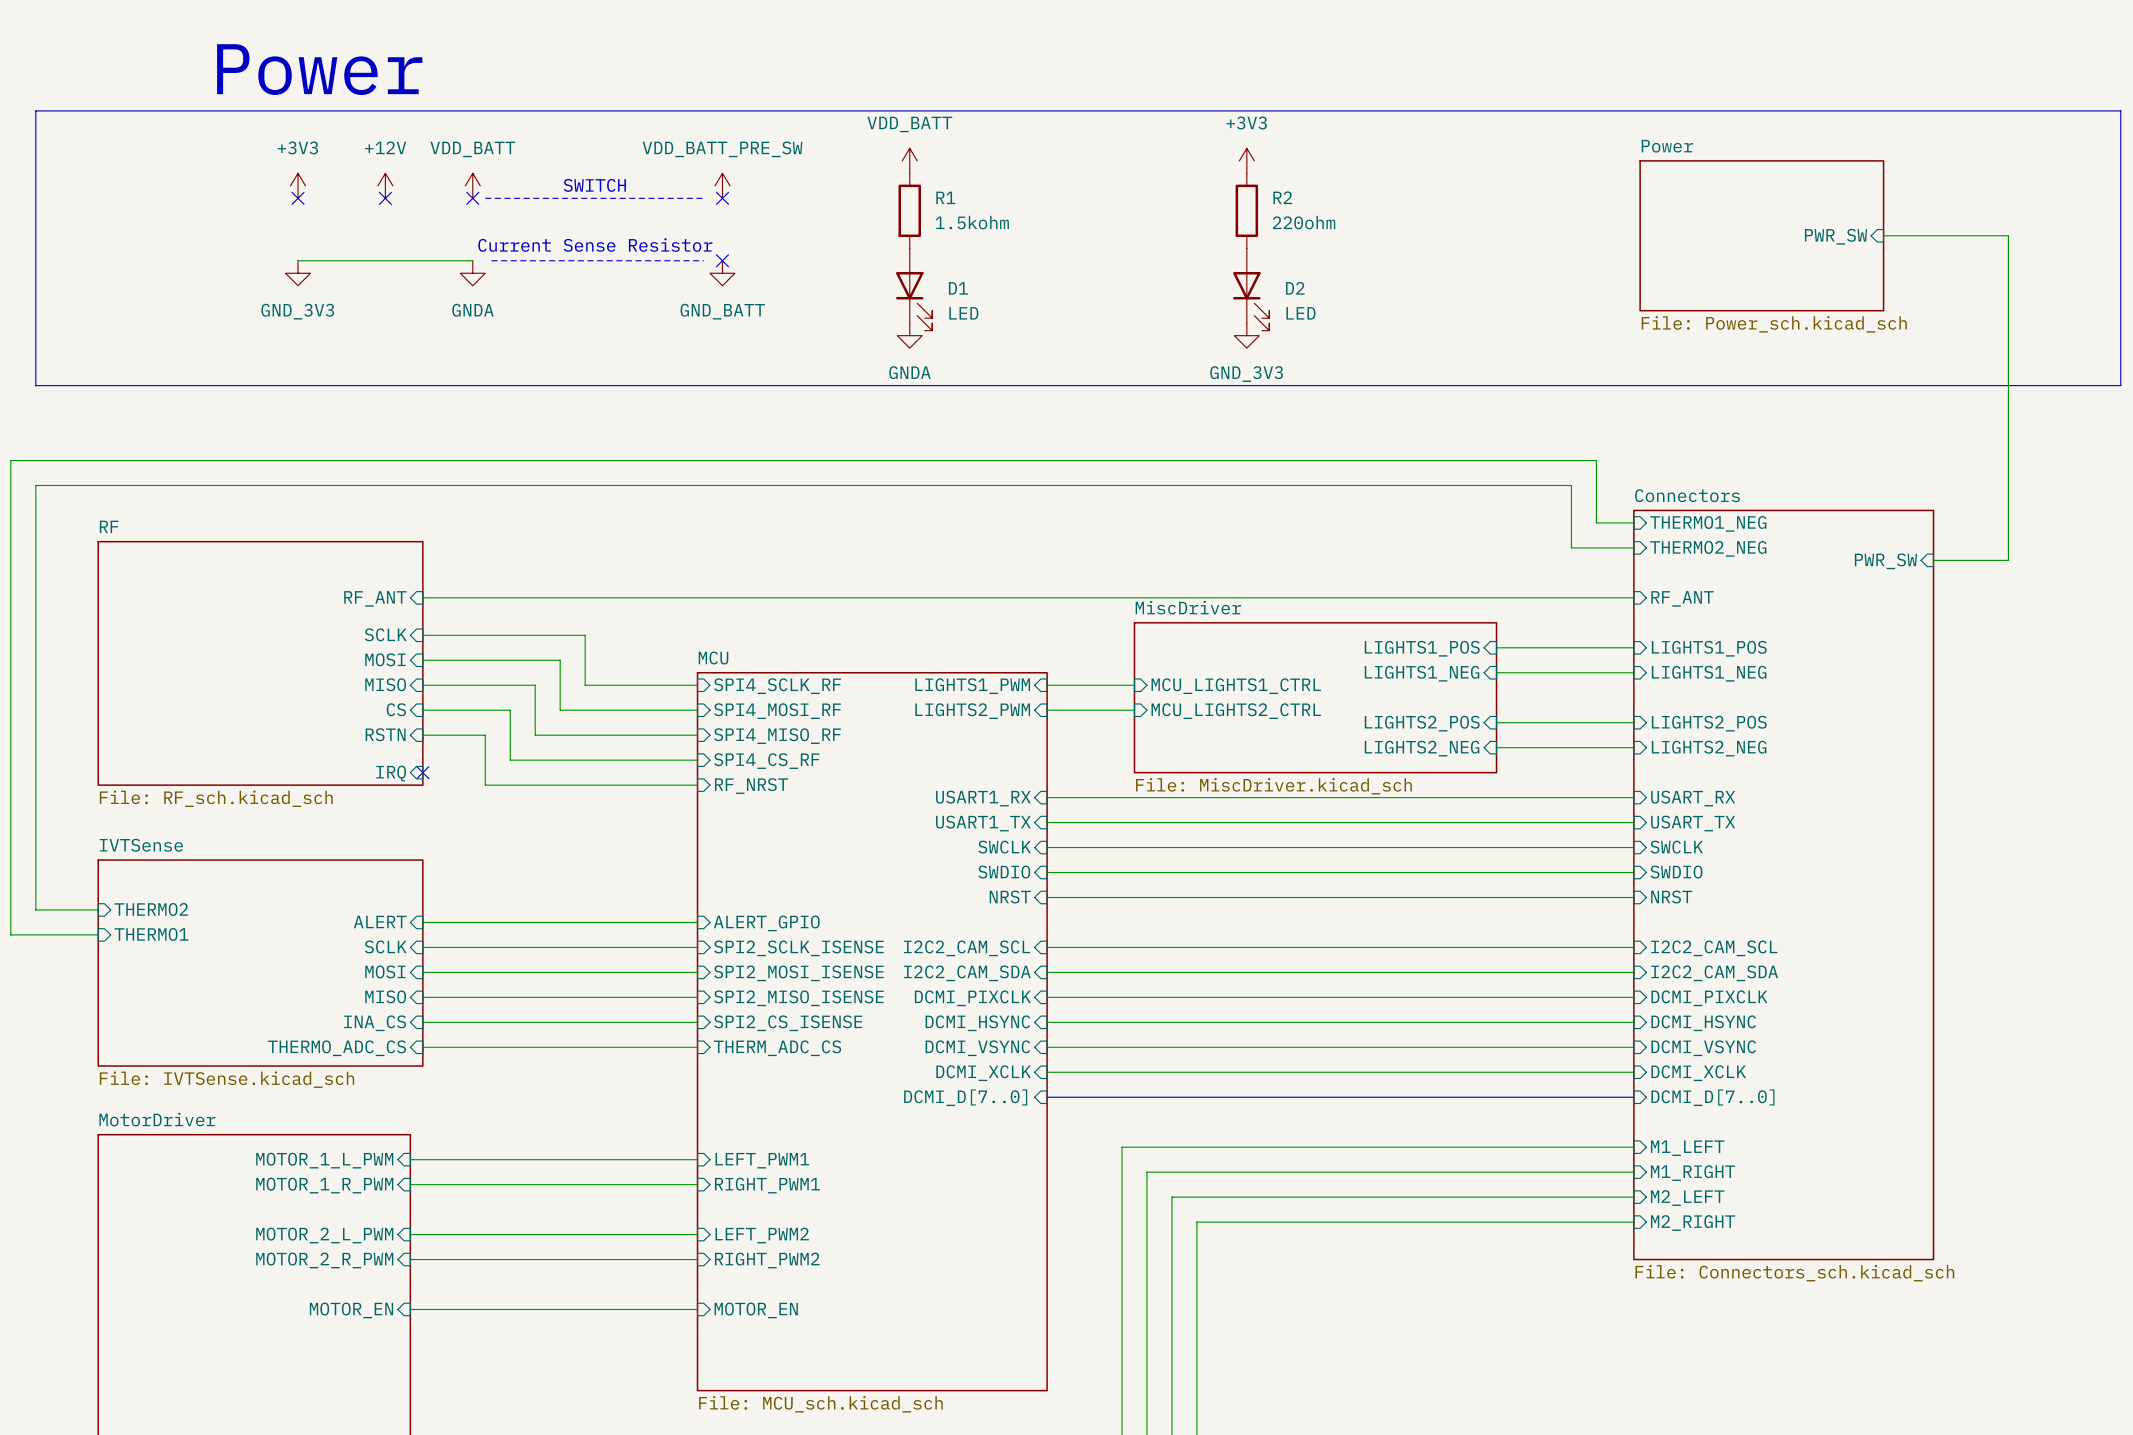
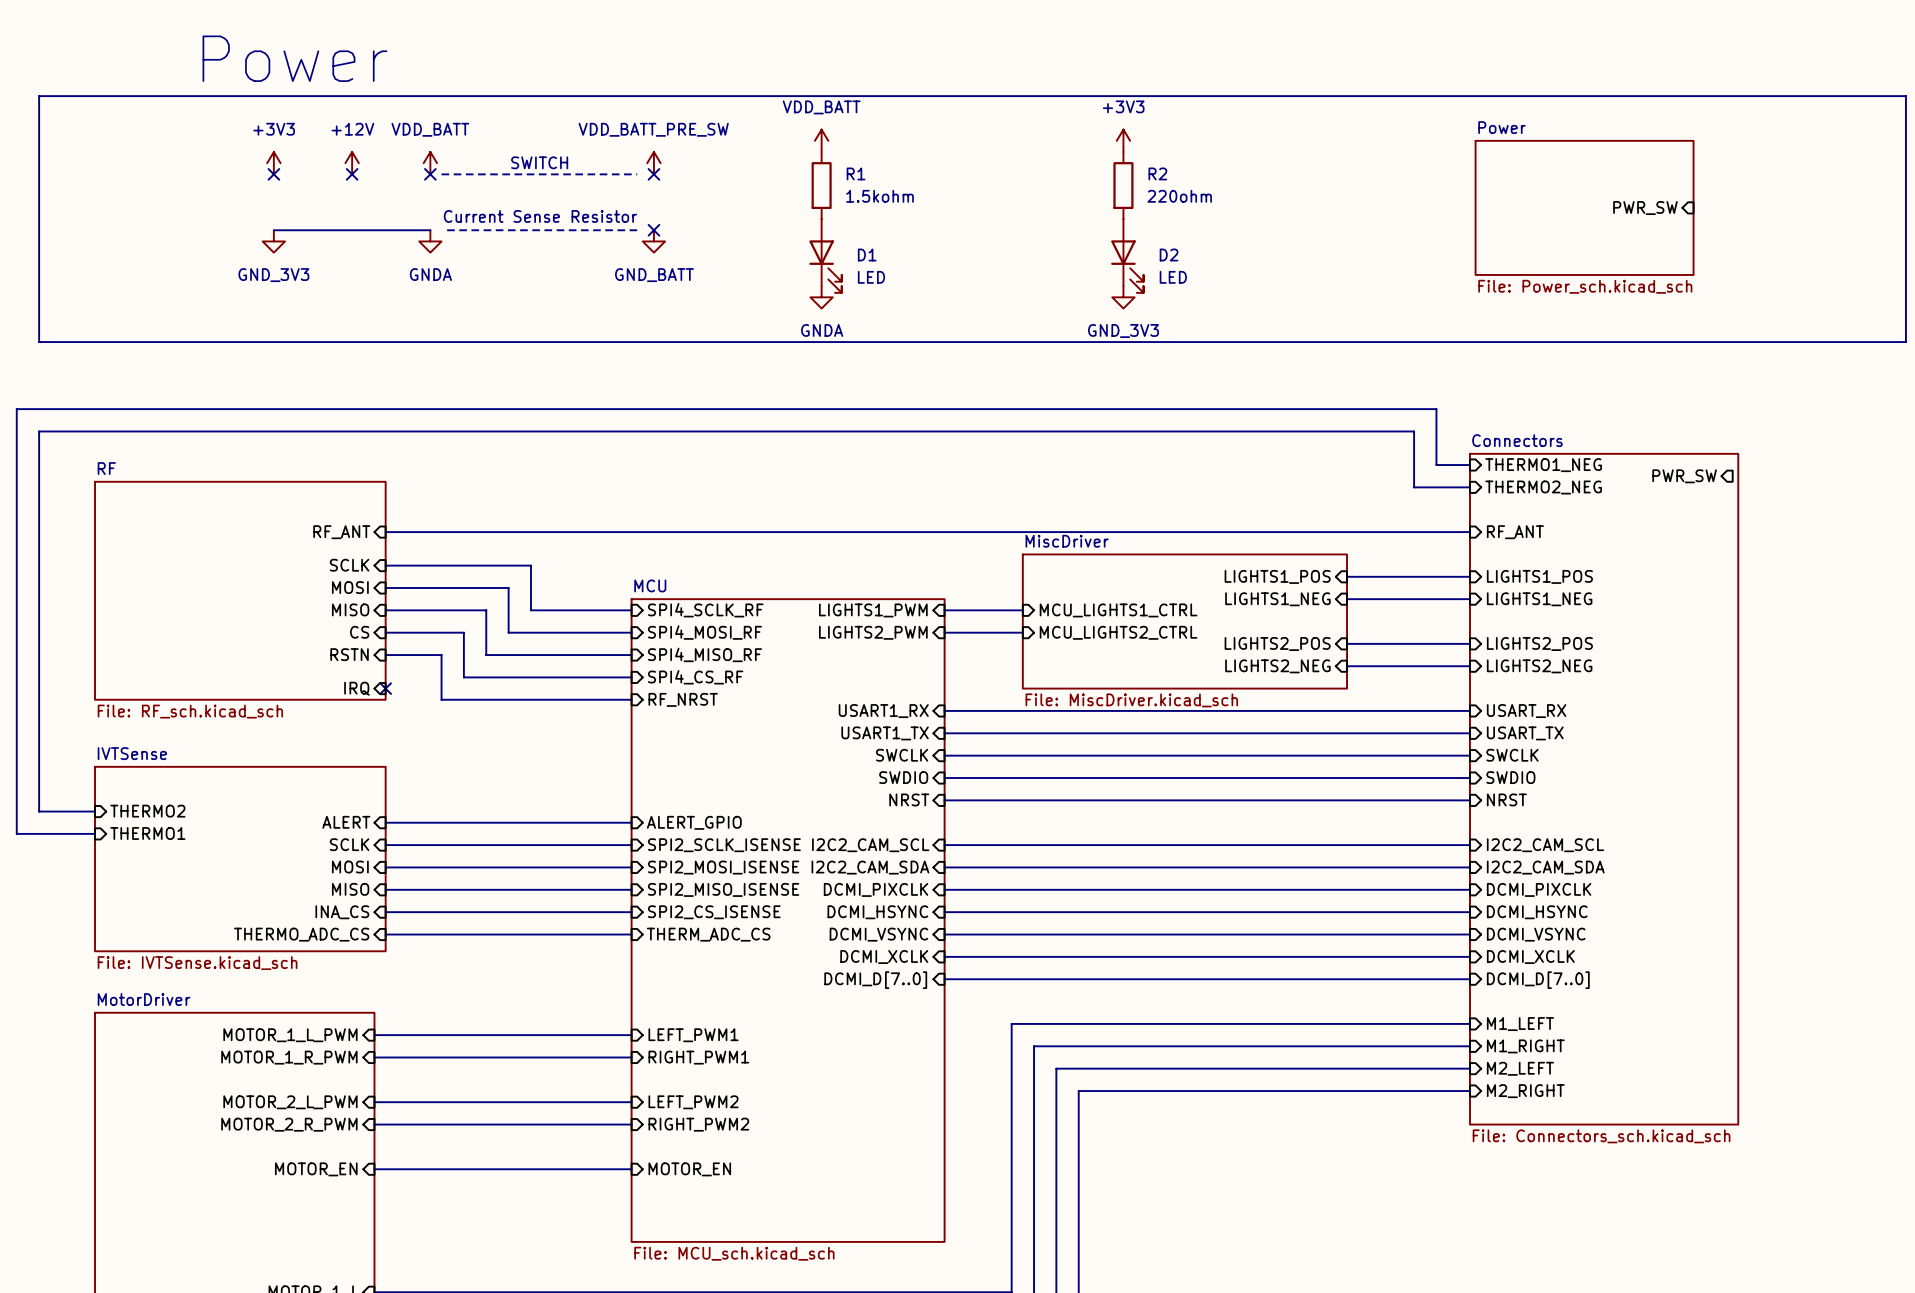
wire: (1883, 235) (2008, 235) (2008, 560) (1933, 560) -> none
sheet pin position: PWR_SW (1885, 561) -> PWR_SW (1684, 476)

